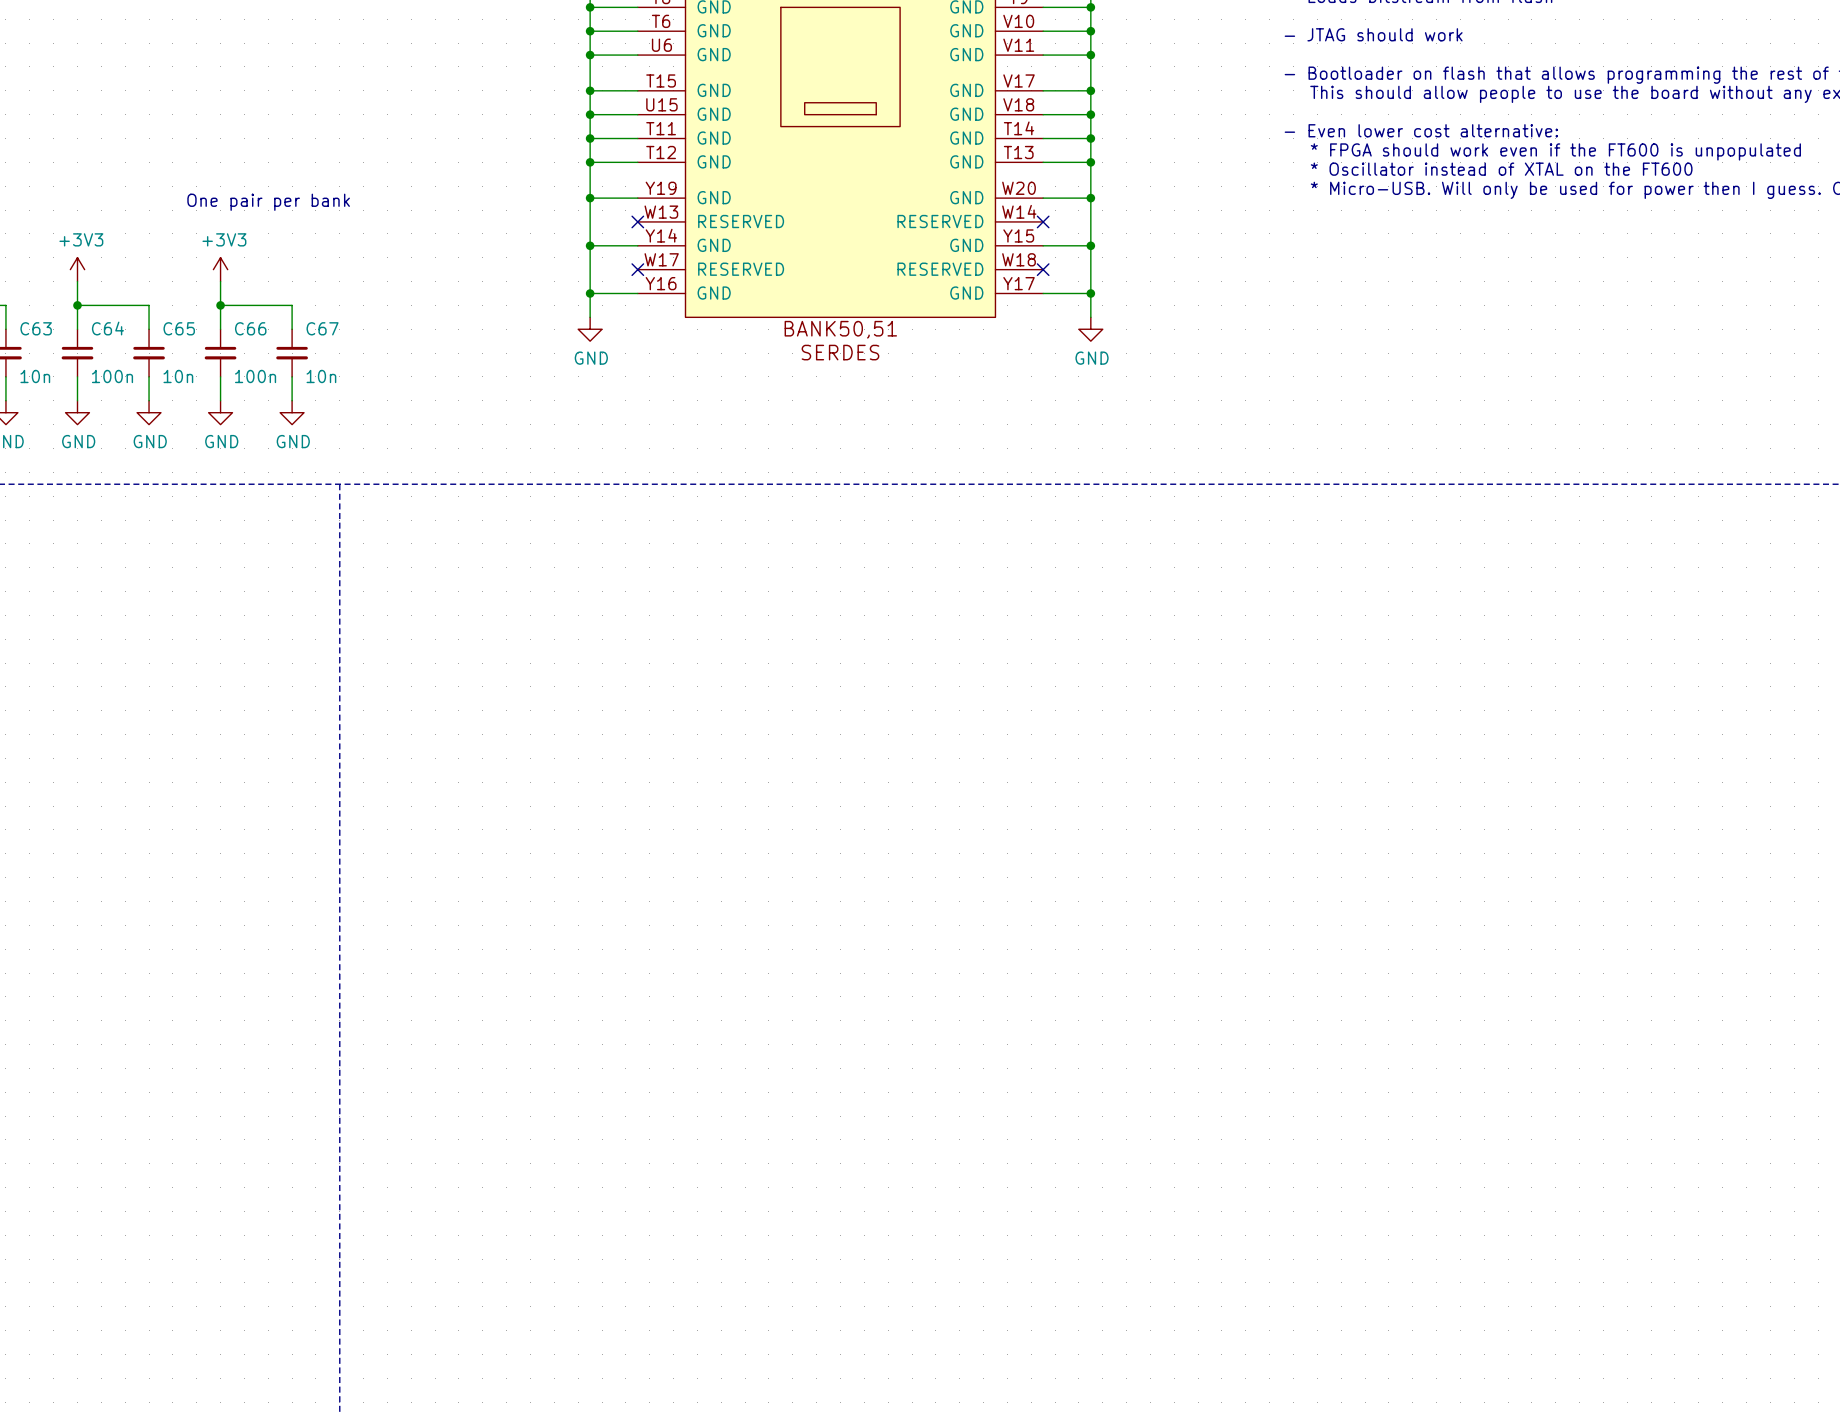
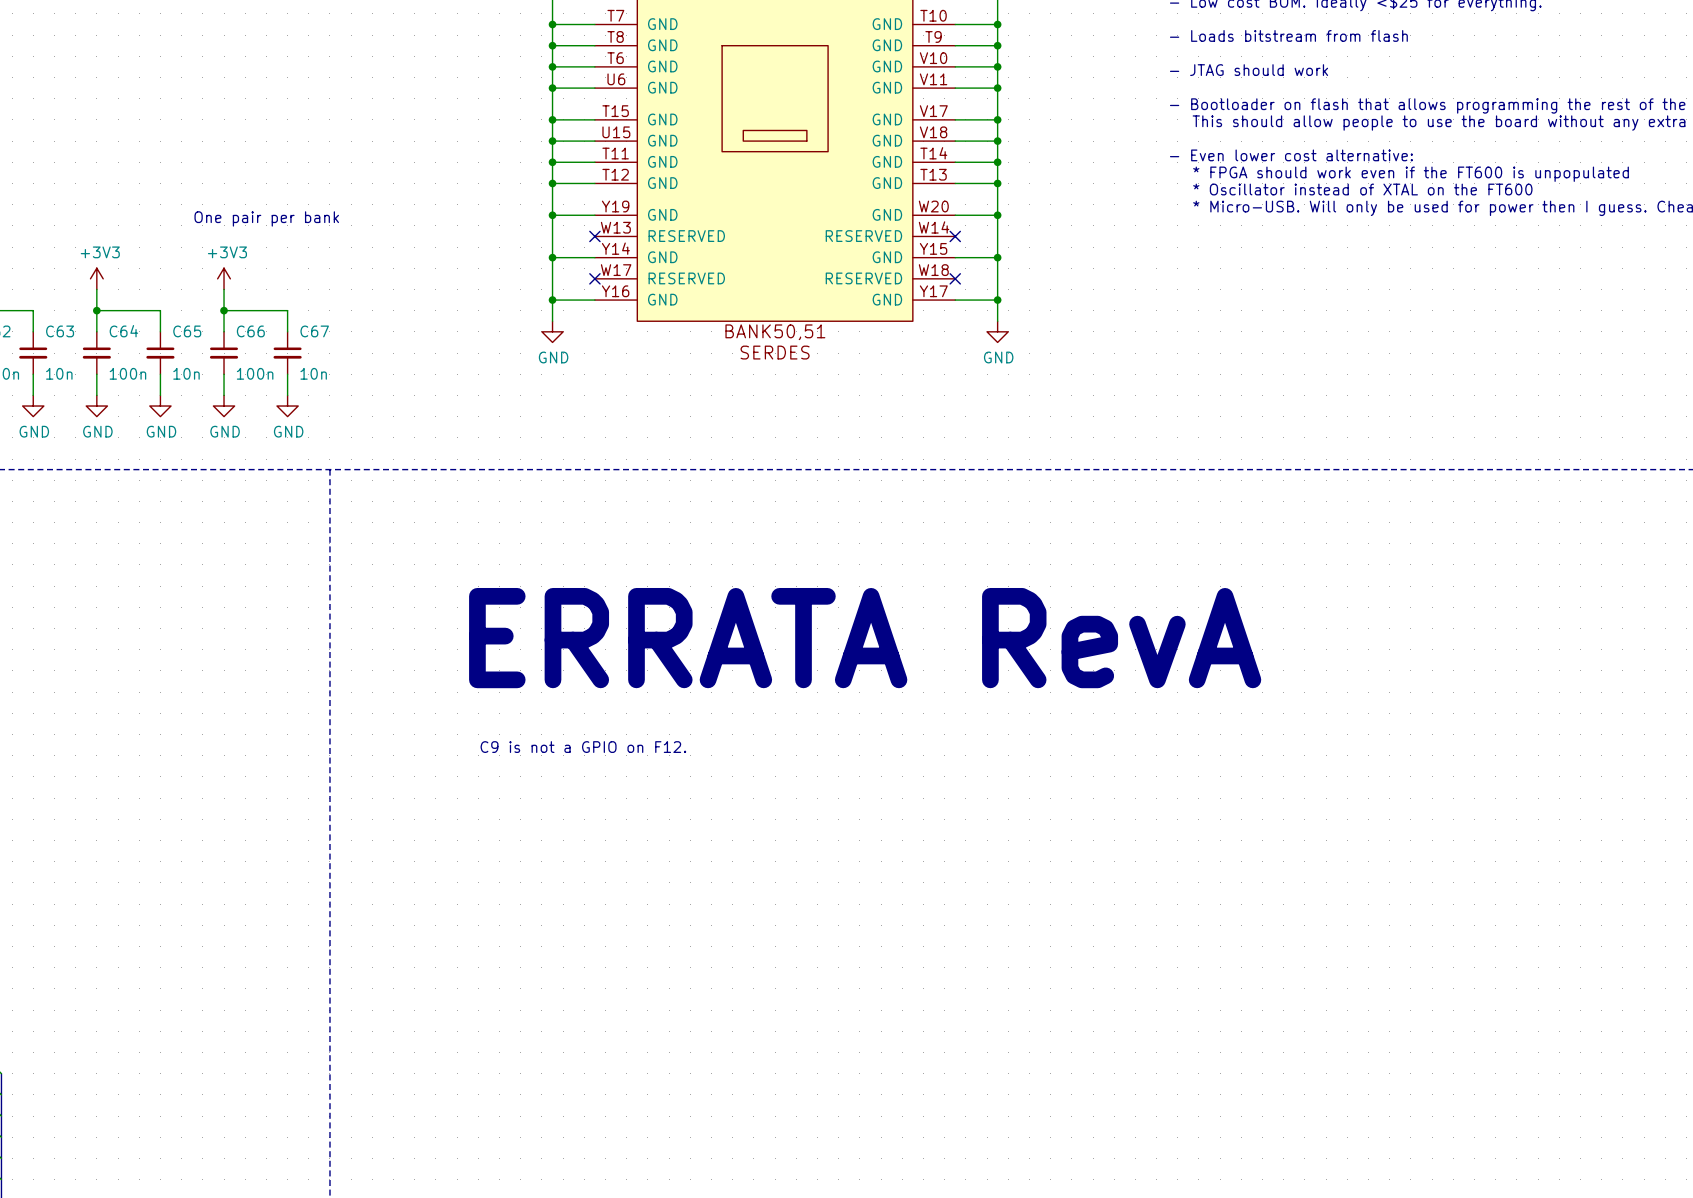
text: none -> ERRATA RevA (865, 638)
text: none -> C9 is not a GPIO on F12. (583, 747)

